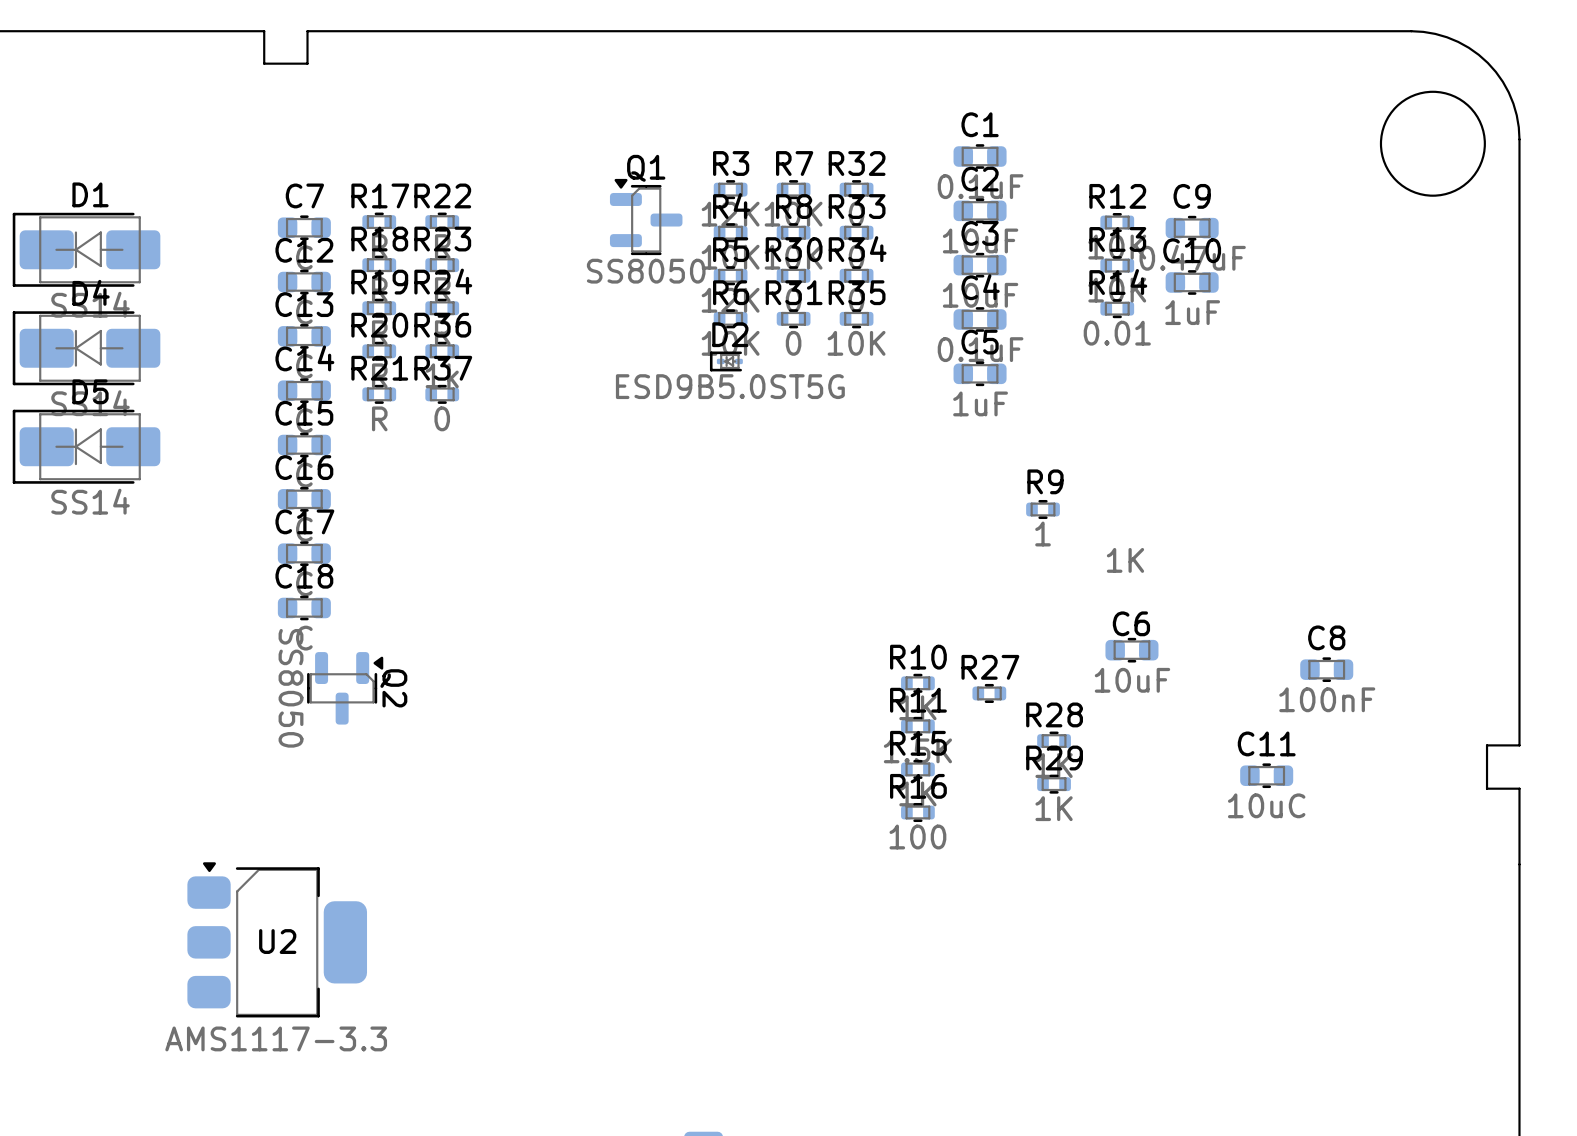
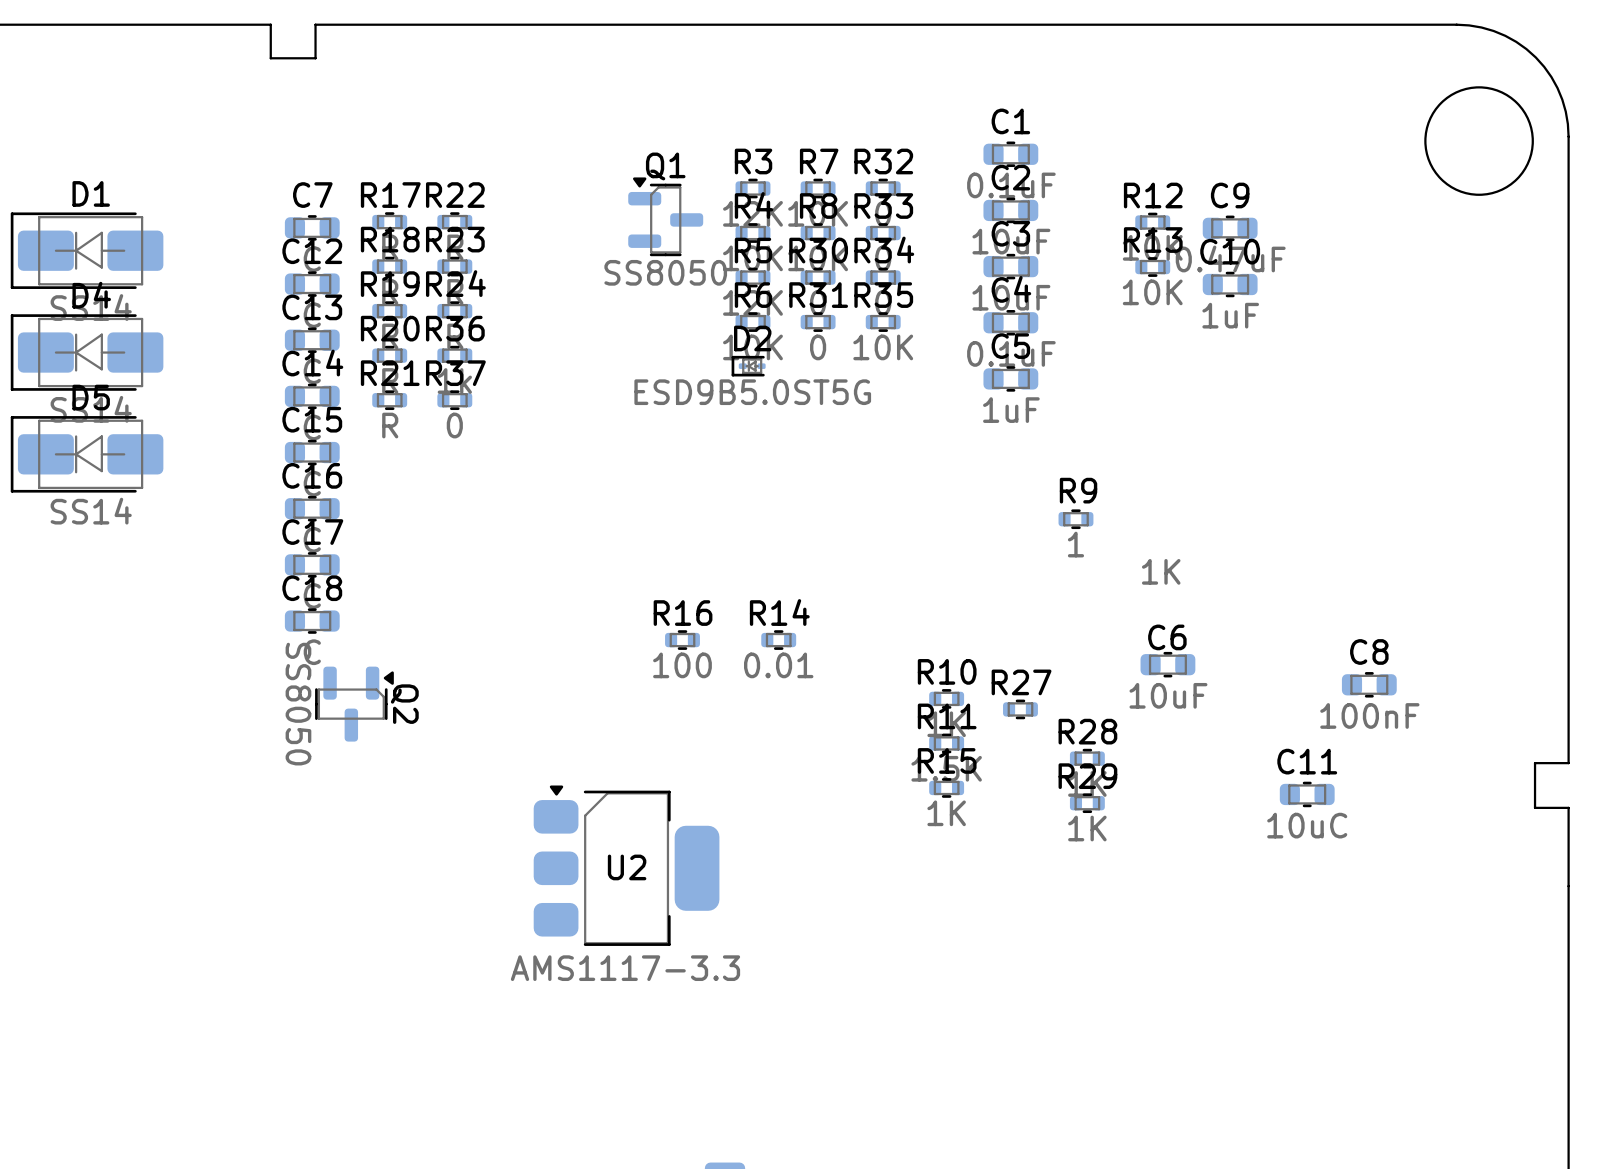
R14 position: (1117, 308) -> (778, 640)
R16 position: (917, 812) -> (682, 640)
U2 position: (277, 939) -> (626, 865)

